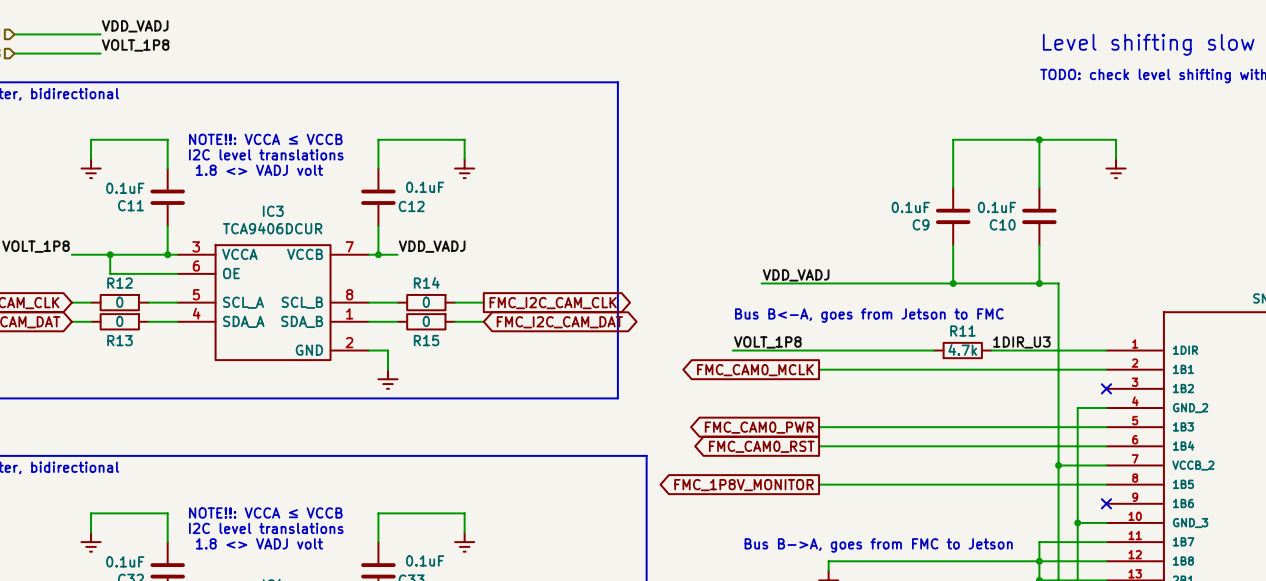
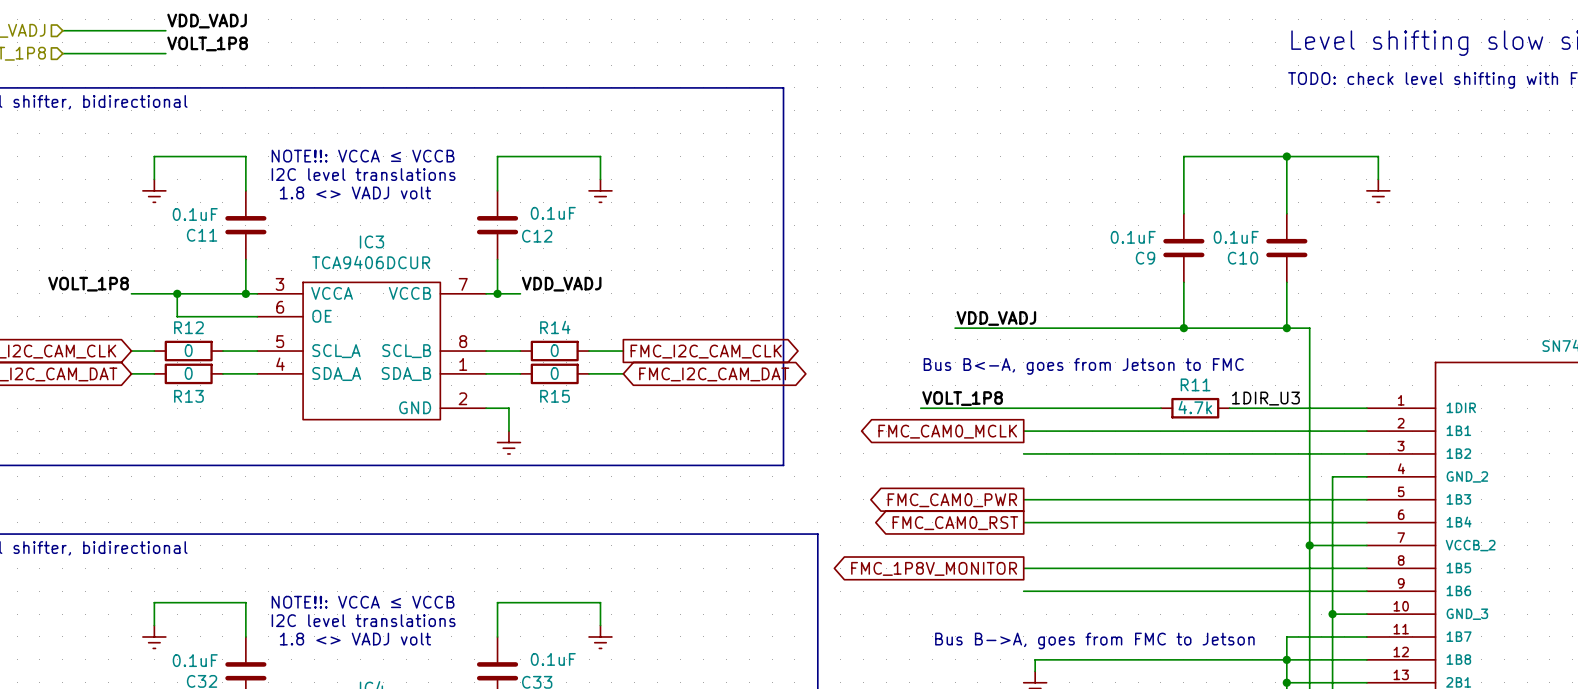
wire: none -> (1023, 453) (1366, 453)
no-connect mark: (1106, 388) -> none
wire: none -> (1023, 591) (1366, 591)
no-connect mark: (1106, 503) -> none

